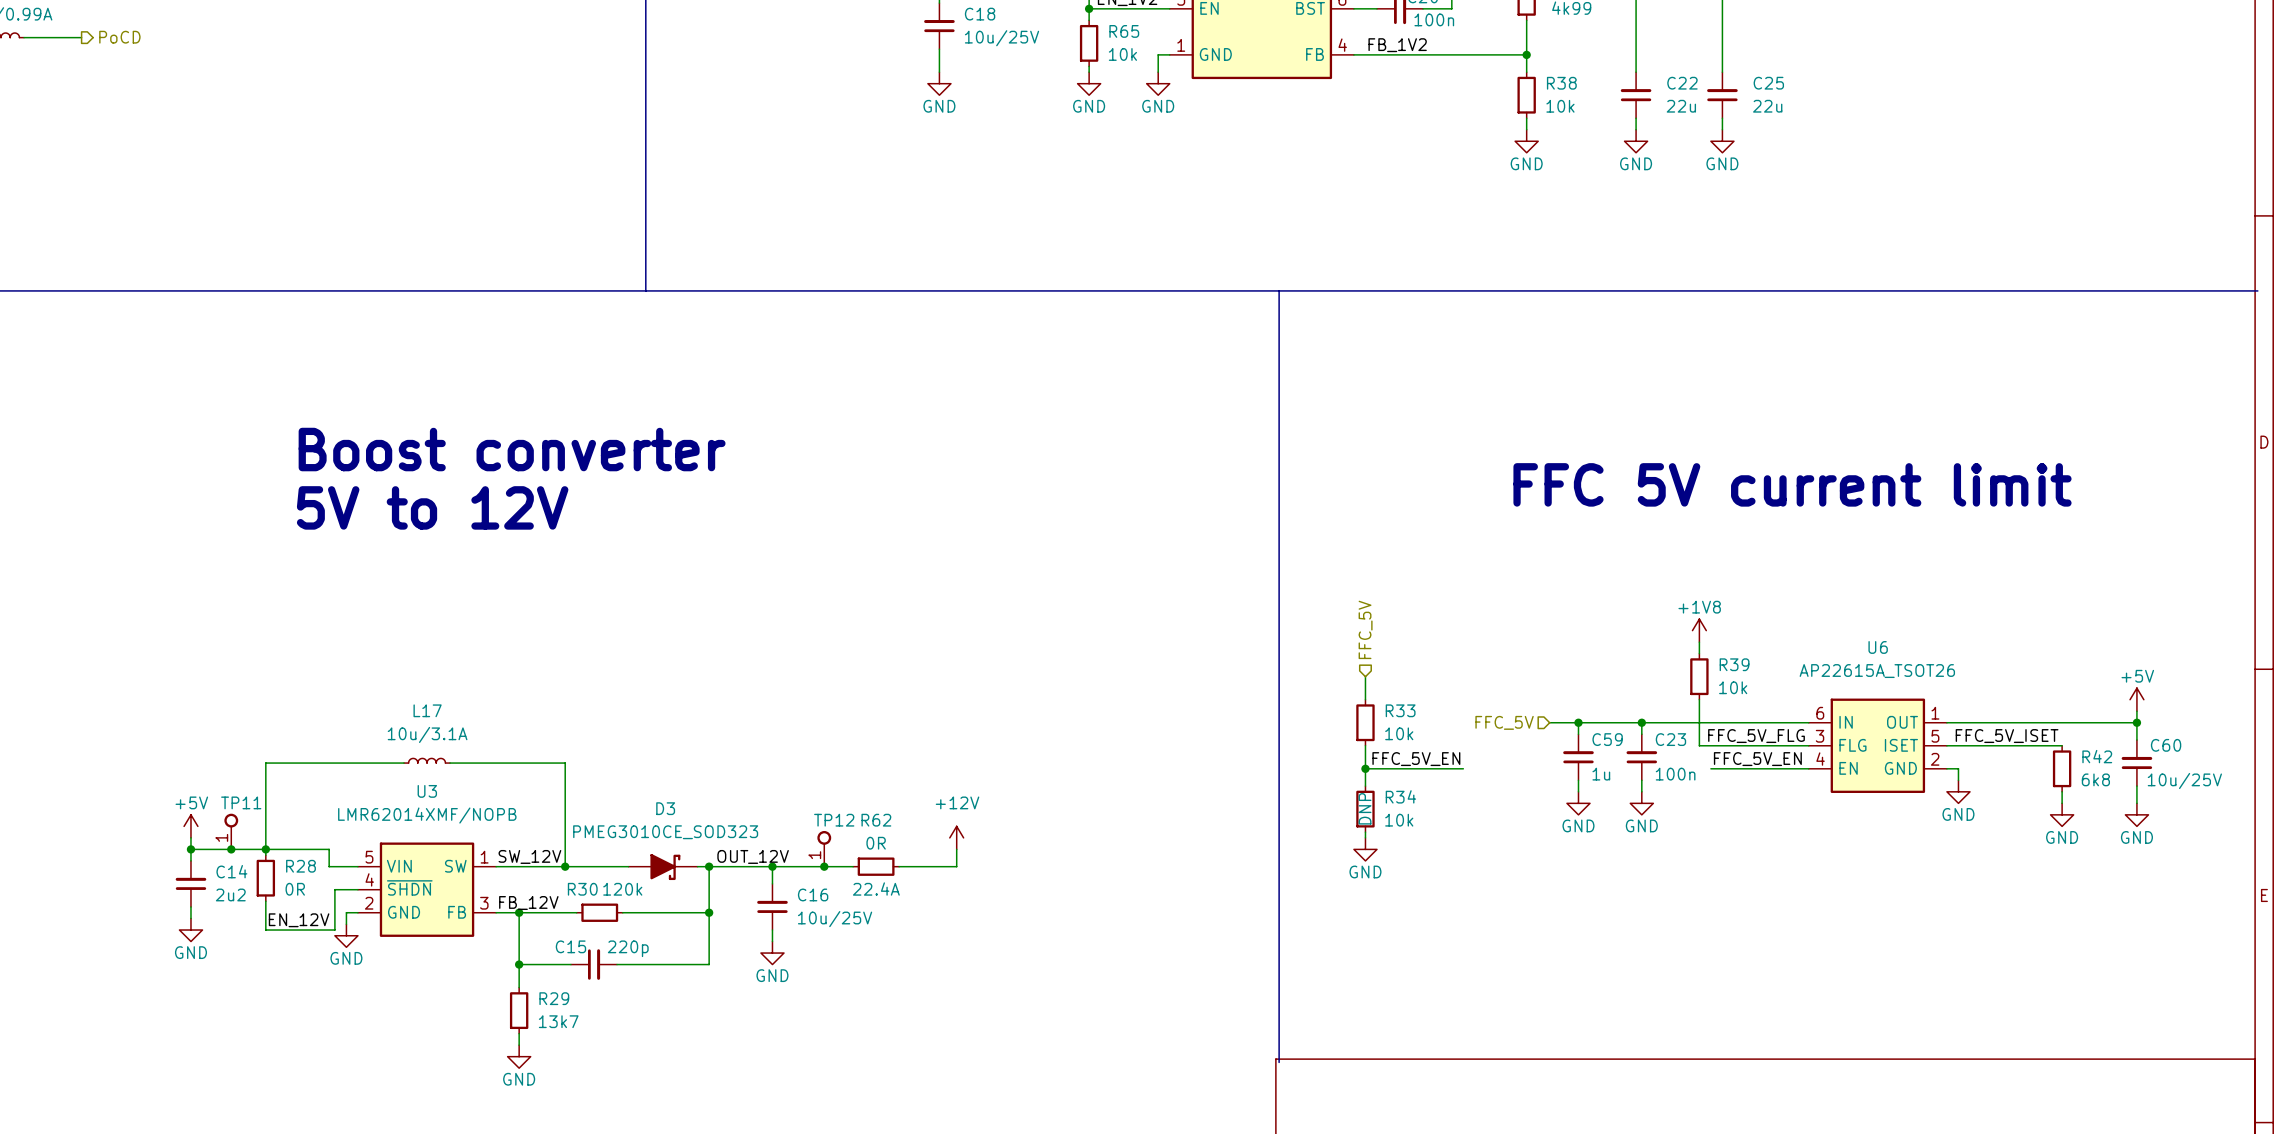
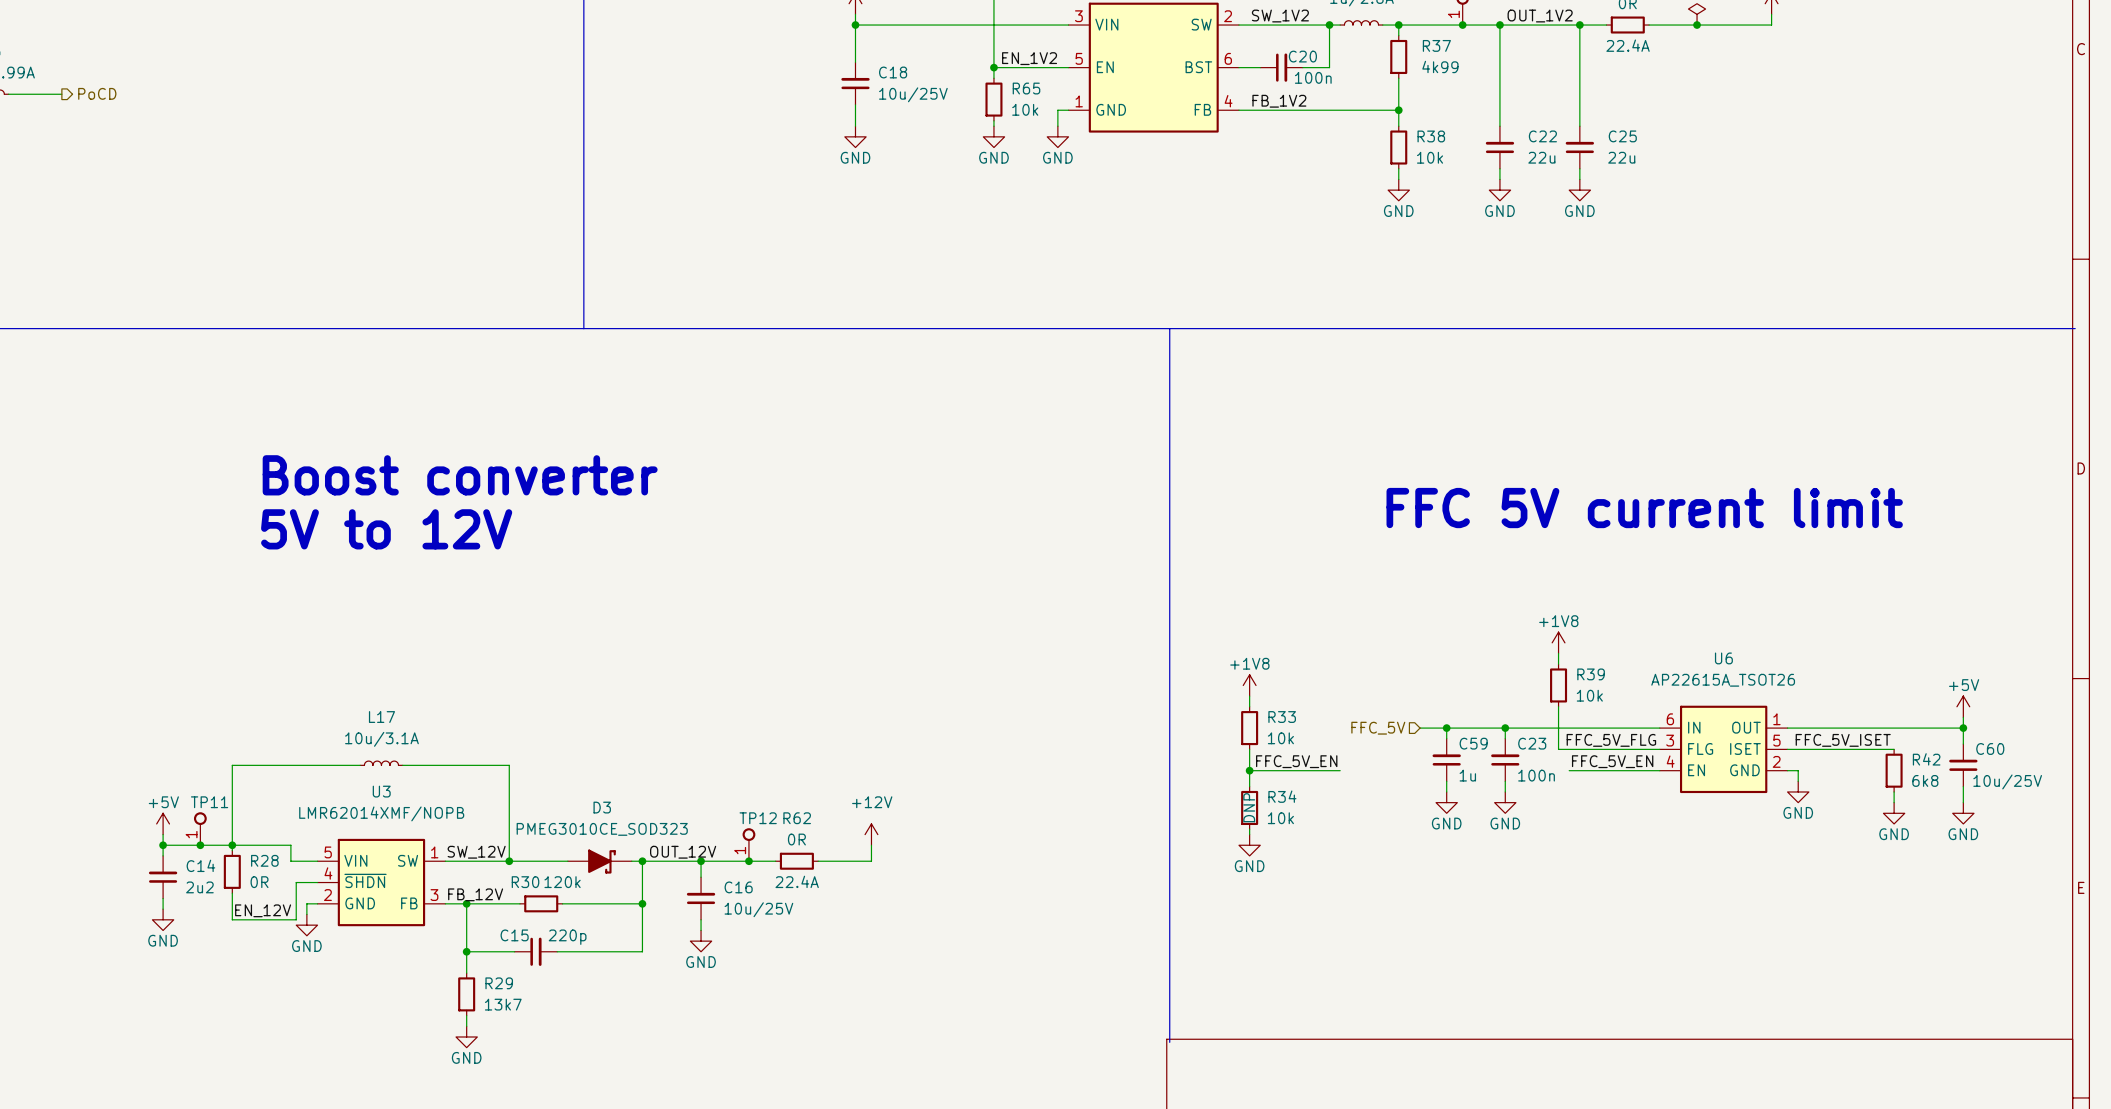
hierarchical label: FFC_5V (1365, 629) -> none
power symbol: none -> +1V8 (1249, 685)

